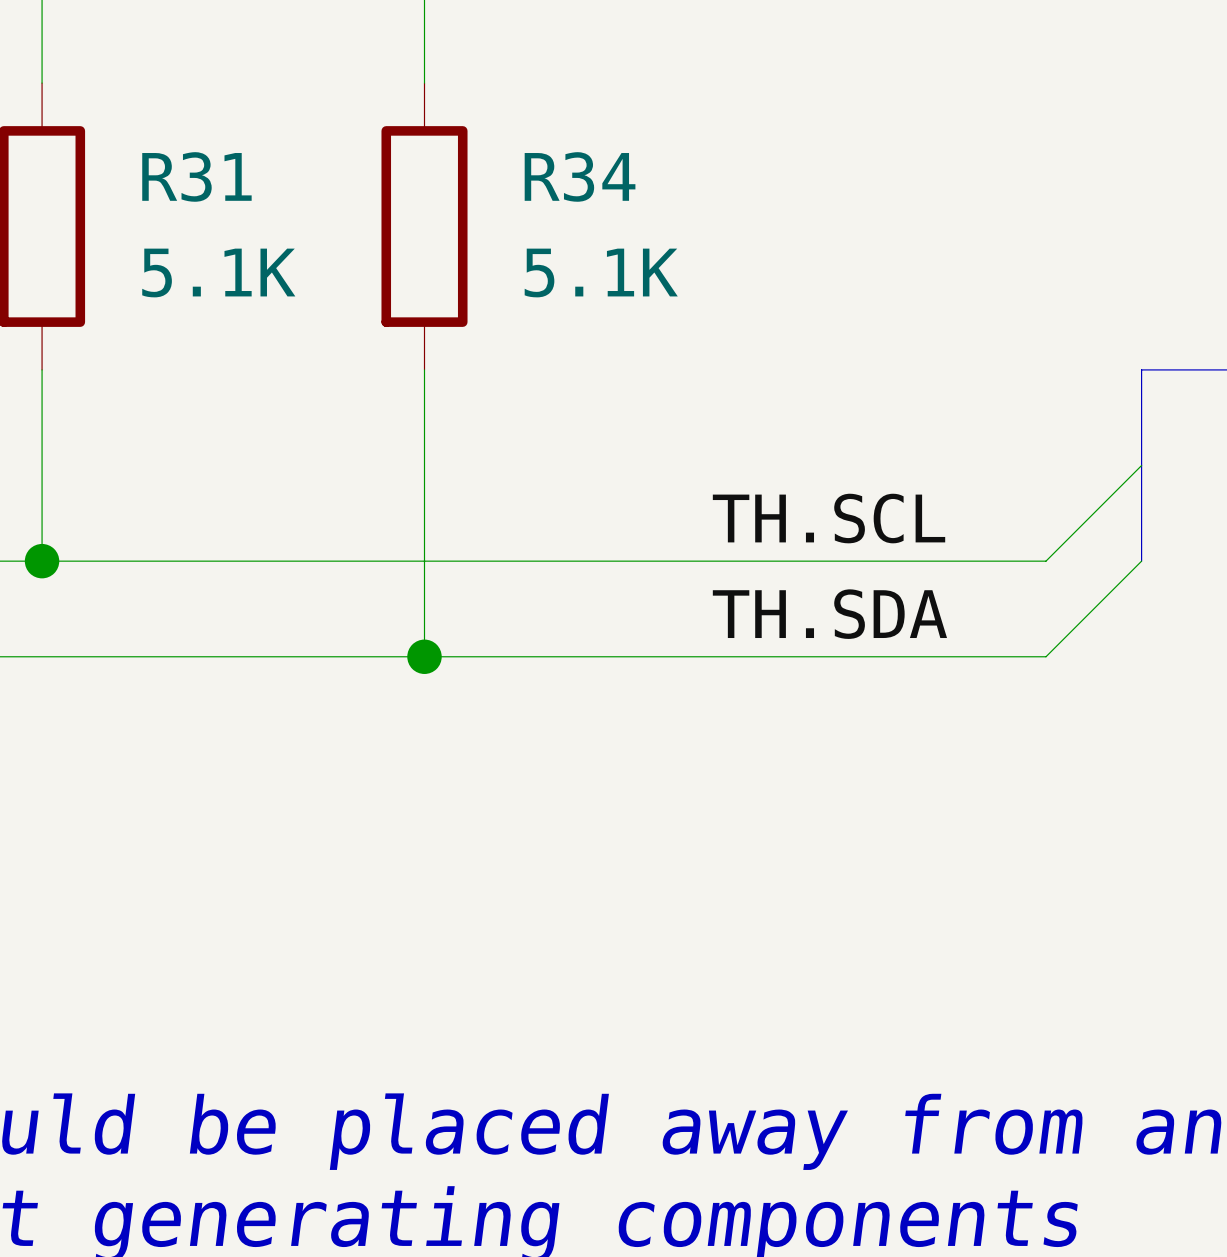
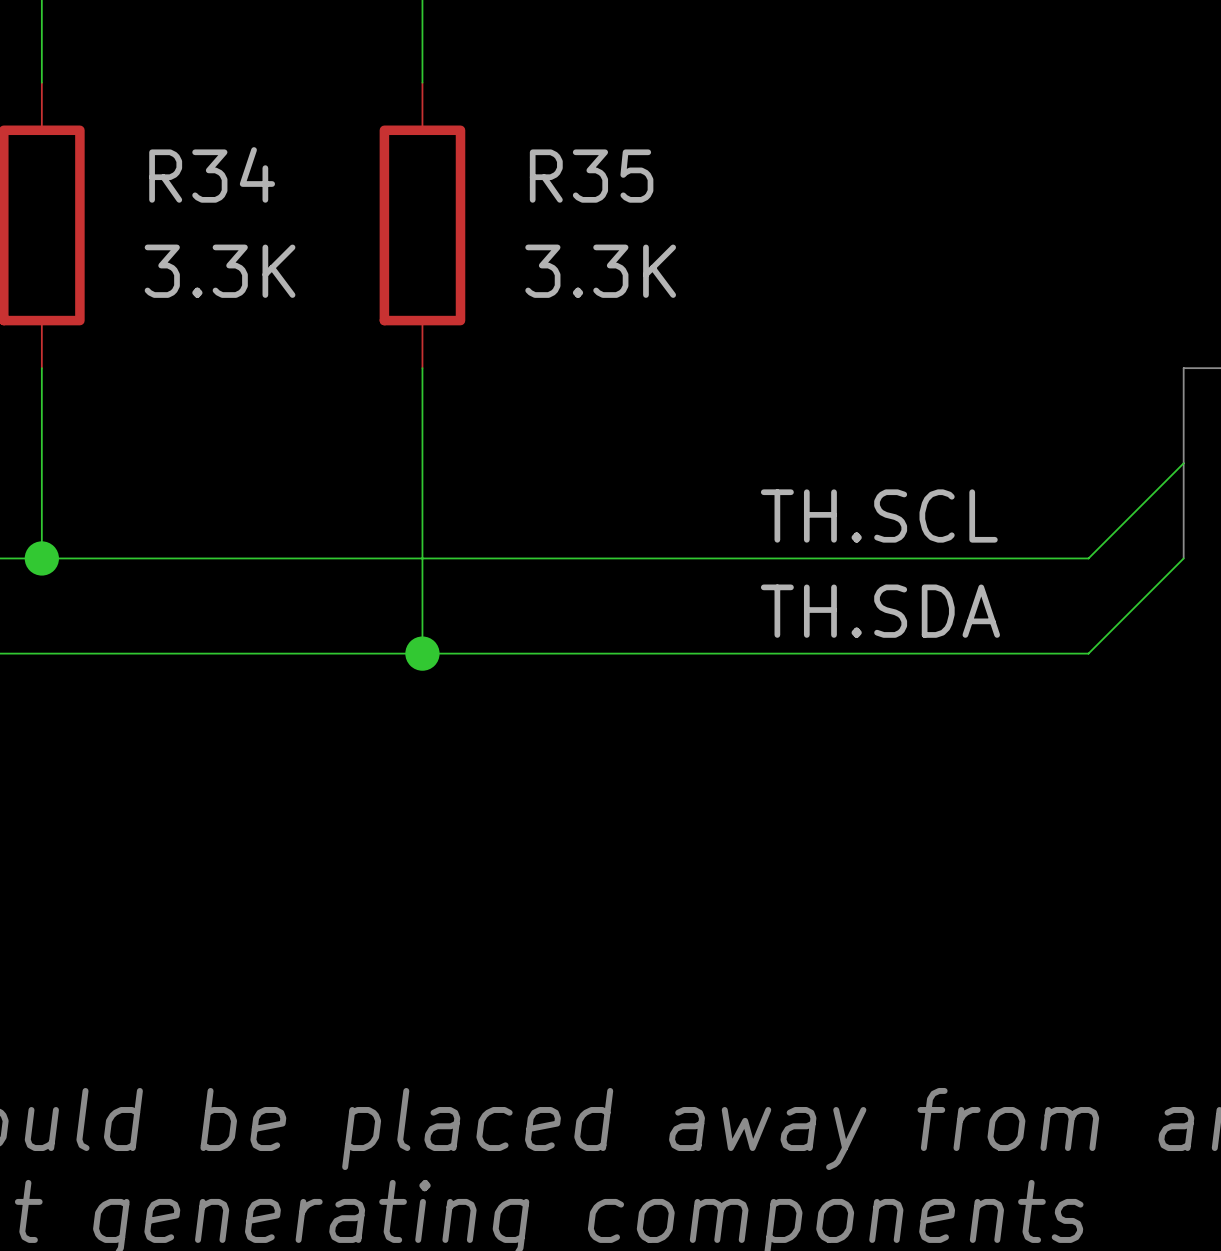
R31 name: R31 (196, 176) -> R34 (212, 174)
R34 name: R34 (580, 176) -> R35 (591, 176)
R31 value: 5.1K (218, 272) -> 3.3K (220, 271)
R34 value: 5.1K (601, 272) -> 3.3K (600, 271)
bus: (1189, 369) (1141, 369) (1141, 561) -> (1183, 368) (1183, 558)
wire: (1141, 465) (1045, 561) -> (1183, 463) (1088, 558) (1040, 558)
label position: TH.SCL (829, 518) -> TH.SCL (879, 516)
wire: (1141, 561) (1045, 656) -> (1183, 558) (1088, 653) (1040, 653)
label position: TH.SDA (829, 614) -> TH.SDA (880, 611)

